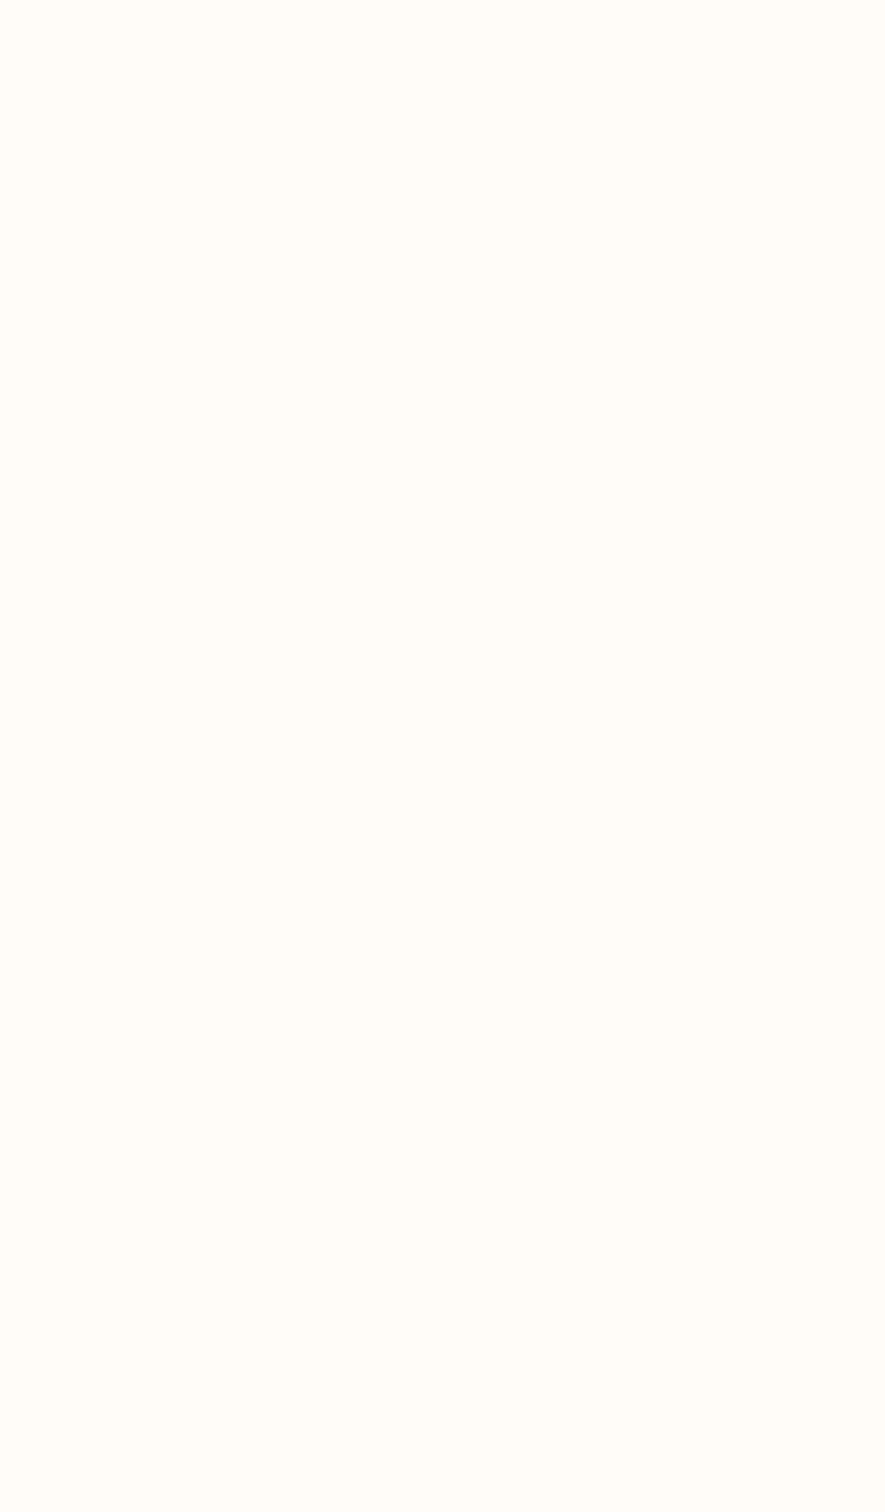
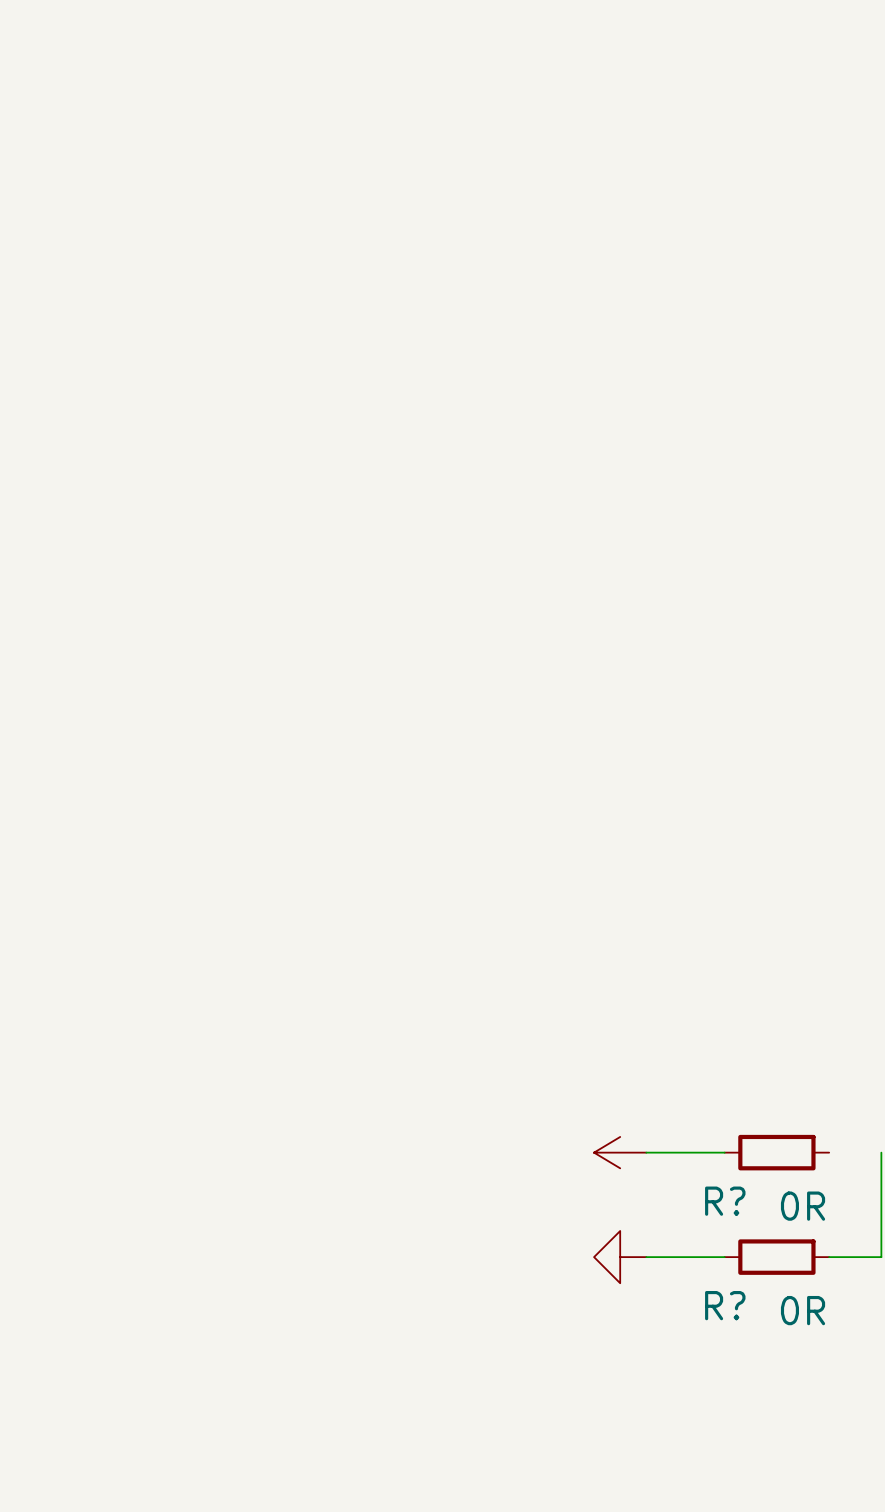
power symbol: none -> (620, 1152)
wire: none -> (646, 1152) (724, 1152)
R?: none -> 0R (776, 1152)
wire: none -> (881, 1152) (881, 1257) (829, 1257)
power symbol: none -> (620, 1257)
wire: none -> (646, 1257) (724, 1257)
R?: none -> 0R (776, 1257)

